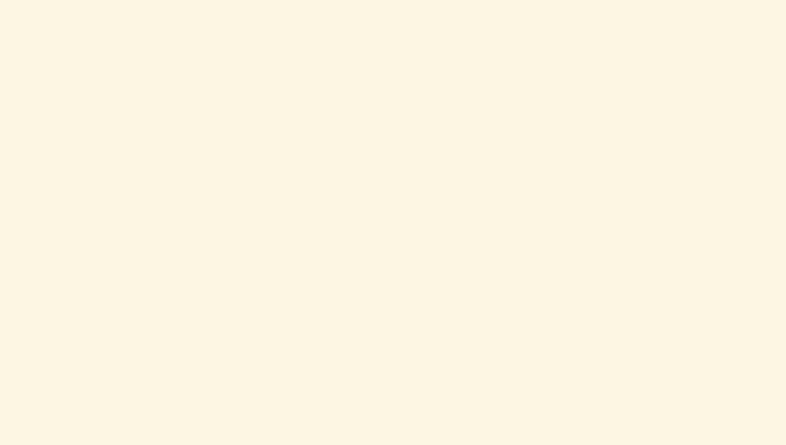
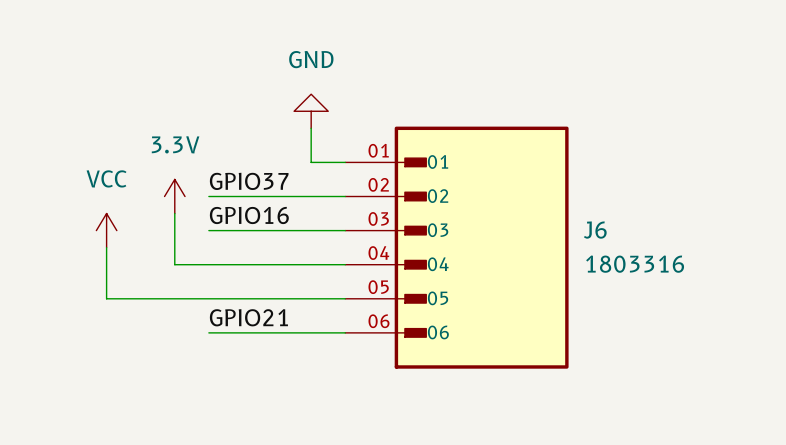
power symbol: none -> GND (311, 111)
wire: none -> (311, 128) (311, 162) (345, 162)
label: none -> GPIO37 (249, 181)
power symbol: none -> 3.3V (174, 196)
wire: none -> (208, 196) (345, 196)
wire: none -> (174, 213) (174, 264) (345, 264)
label: none -> GPIO16 (249, 215)
power symbol: none -> VCC (106, 230)
wire: none -> (208, 230) (345, 230)
wire: none -> (106, 247) (106, 298) (345, 298)
J6: none -> 1803316 (456, 247)
label: none -> GPIO21 (248, 317)
wire: none -> (208, 332) (345, 332)

